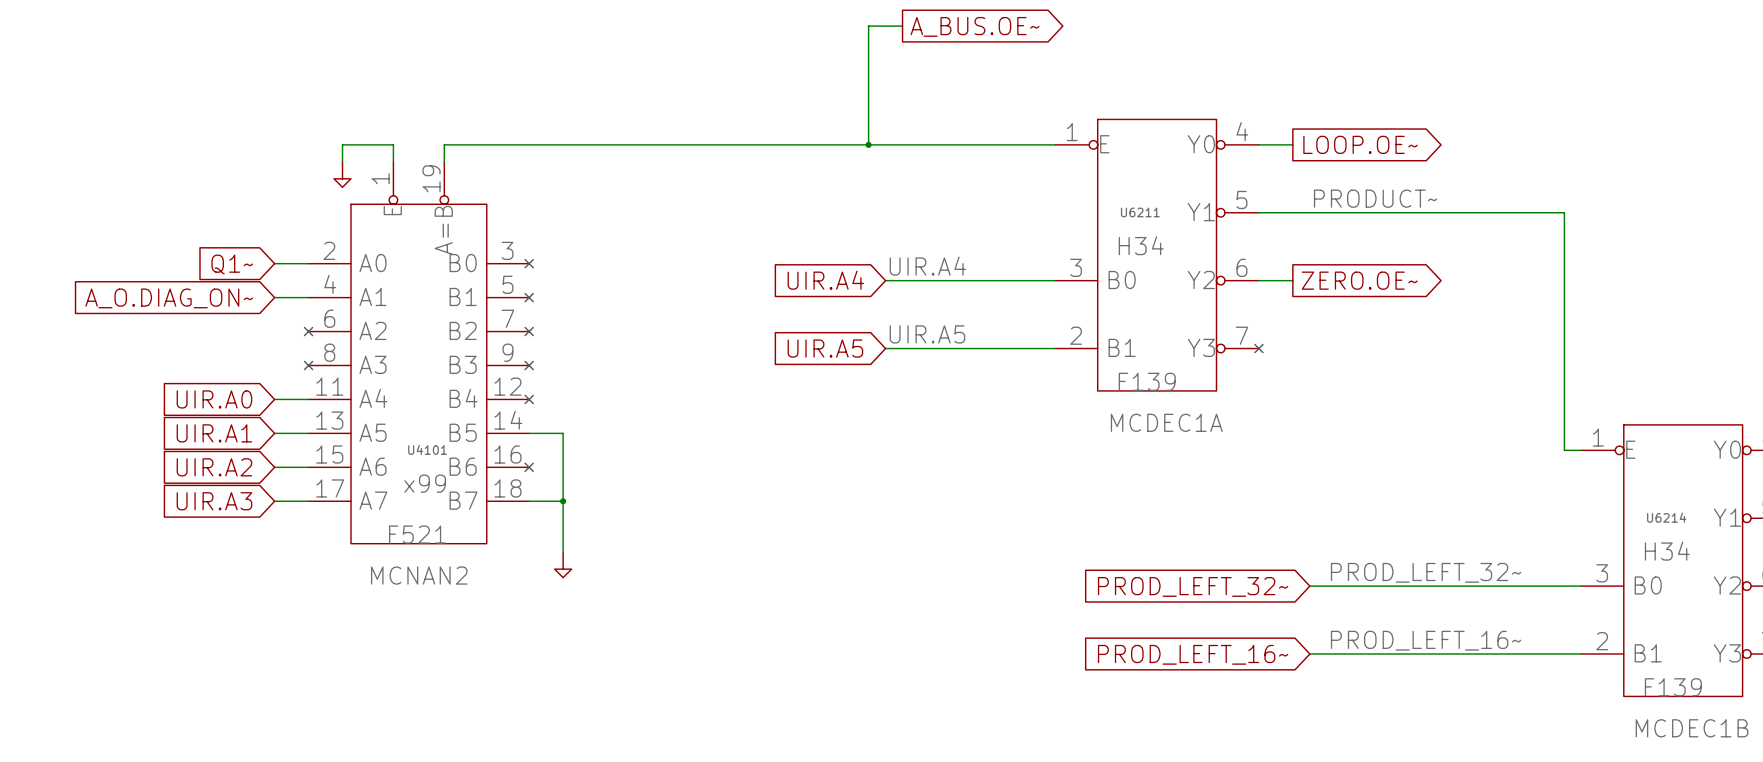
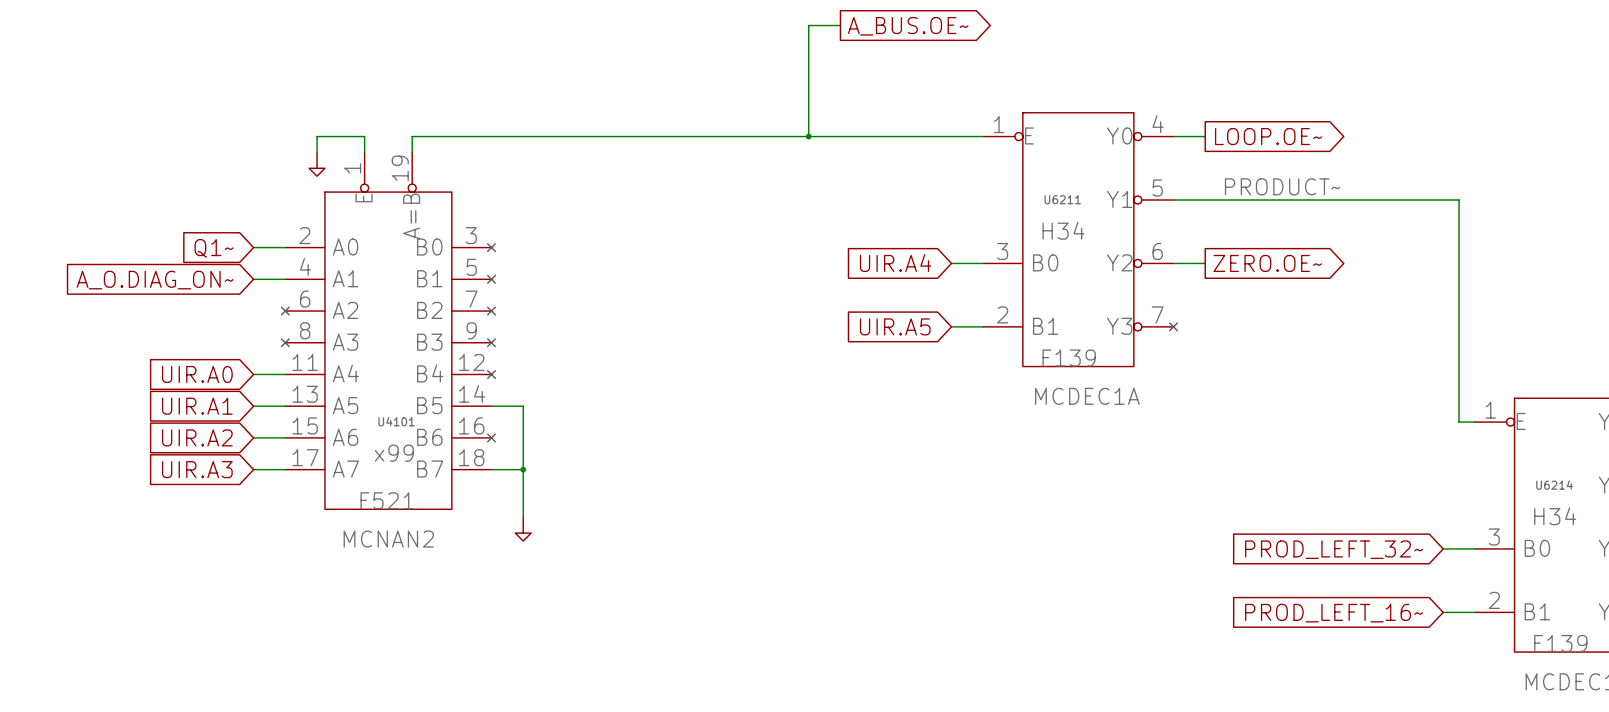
label: UIR.A4 (927, 266) -> none
global label position: UIR.A4 (825, 280) -> UIR.A4 (895, 263)
wire: (885, 280) (1021, 280) -> none
label: UIR.A5 (927, 334) -> none
global label position: UIR.A5 (825, 348) -> UIR.A5 (895, 326)
wire: (885, 348) (1021, 348) -> none
label: PROD_LEFT_32~ (1426, 572) -> none
global label: PROD_LEFT_32~ (1193, 586) -> none
wire: (1309, 586) (1547, 586) -> none
global label: none -> PROD_LEFT_32~ (1334, 549)
label: PROD_LEFT_16~ (1426, 640) -> none
global label: PROD_LEFT_16~ (1193, 654) -> none
wire: (1309, 654) (1547, 654) -> none
global label: none -> PROD_LEFT_16~ (1334, 613)

